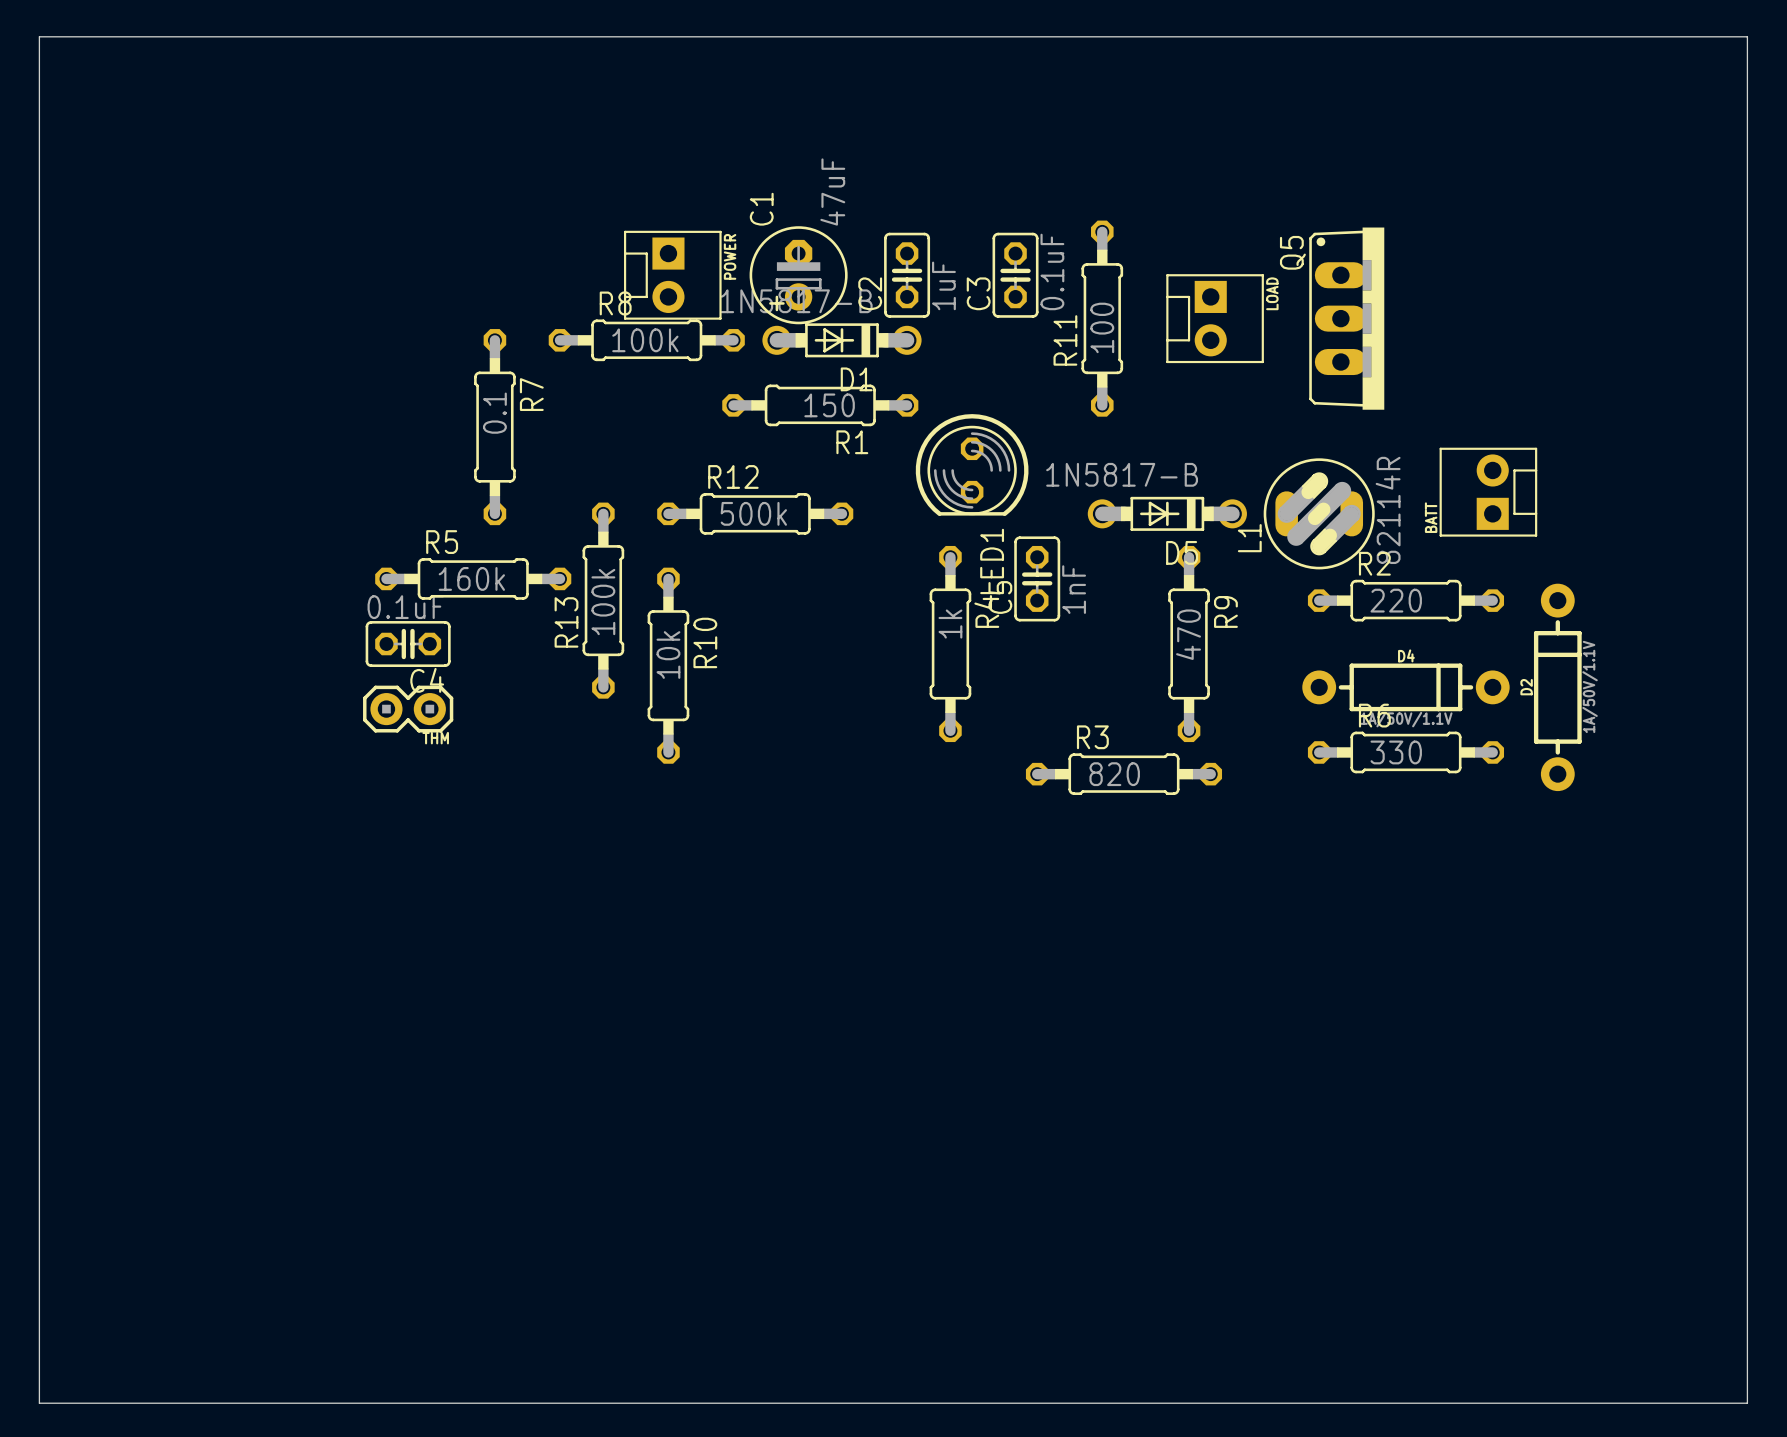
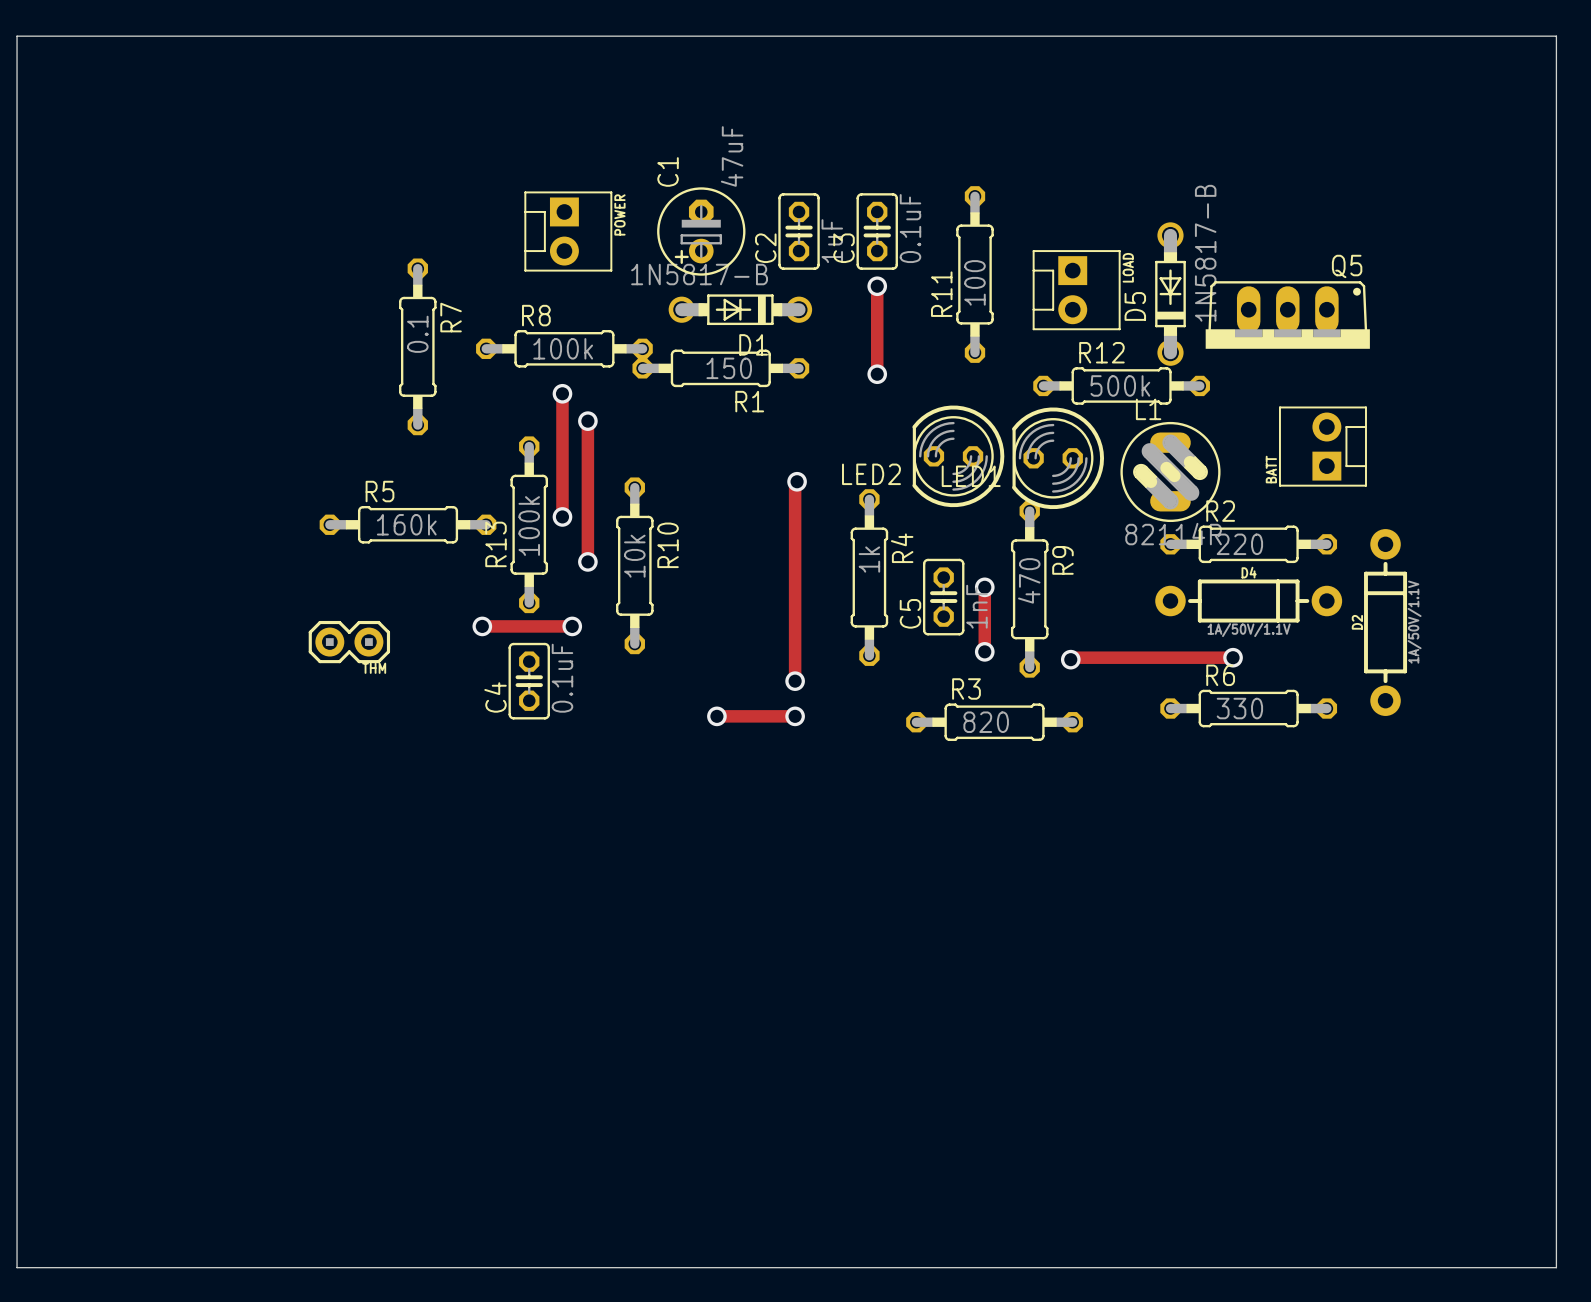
POWER position: (672, 275) -> (568, 231)
C1 position: (798, 275) -> (701, 231)
C2 position: (907, 275) -> (799, 231)
C3 position: (1015, 275) -> (877, 231)
track: none -> (877, 286) (877, 374)
via: none -> (877, 286)
R11 position: (1102, 318) -> (974, 274)
Q5 rotation: 0° (1346, 318) -> 90° clockwise (1287, 314)
R8 position: (646, 340) -> (564, 348)
via: none -> (877, 374)
R7 position: (494, 427) -> (417, 346)
track: none -> (562, 393) (562, 516)
via: none -> (562, 393)
track: none -> (587, 421) (587, 561)
via: none -> (587, 421)
LED1 rotation: 0° (972, 465) -> 90° clockwise (1058, 458)
LED1 position: (972, 465) -> (1058, 458)
LED2: none -> (958, 456)
R12 position: (755, 513) -> (1121, 385)
D5 rotation: 0° (1167, 513) -> 90° clockwise (1170, 294)
D5 position: (1167, 513) -> (1170, 294)
L1 rotation: 0° (1319, 513) -> 90° clockwise (1170, 471)
track: none -> (797, 481) (795, 481) (795, 681)
via: none -> (797, 481)
via: none -> (562, 516)
C5 position: (1037, 578) -> (943, 597)
R13 position: (603, 600) -> (529, 524)
via: none -> (587, 561)
C4 rotation: 0° (408, 644) -> 90° clockwise (529, 681)
C4 position: (408, 644) -> (529, 681)
R4 position: (950, 644) -> (869, 577)
R9 position: (1189, 644) -> (1029, 589)
track: none -> (984, 587) (984, 651)
via: none -> (984, 587)
R10 position: (668, 665) -> (634, 565)
D4 position: (1405, 687) -> (1248, 601)
track: none -> (482, 626) (572, 626)
via: none -> (482, 626)
via: none -> (572, 626)
via: none -> (984, 651)
track: none -> (1233, 657) (1070, 657) (1070, 659)
via: none -> (1233, 657)
via: none -> (1070, 659)
via: none -> (795, 681)
R6 position: (1405, 752) -> (1248, 708)
R3 position: (1123, 774) -> (994, 722)
track: none -> (716, 716) (795, 716)
via: none -> (716, 716)
via: none -> (795, 716)

